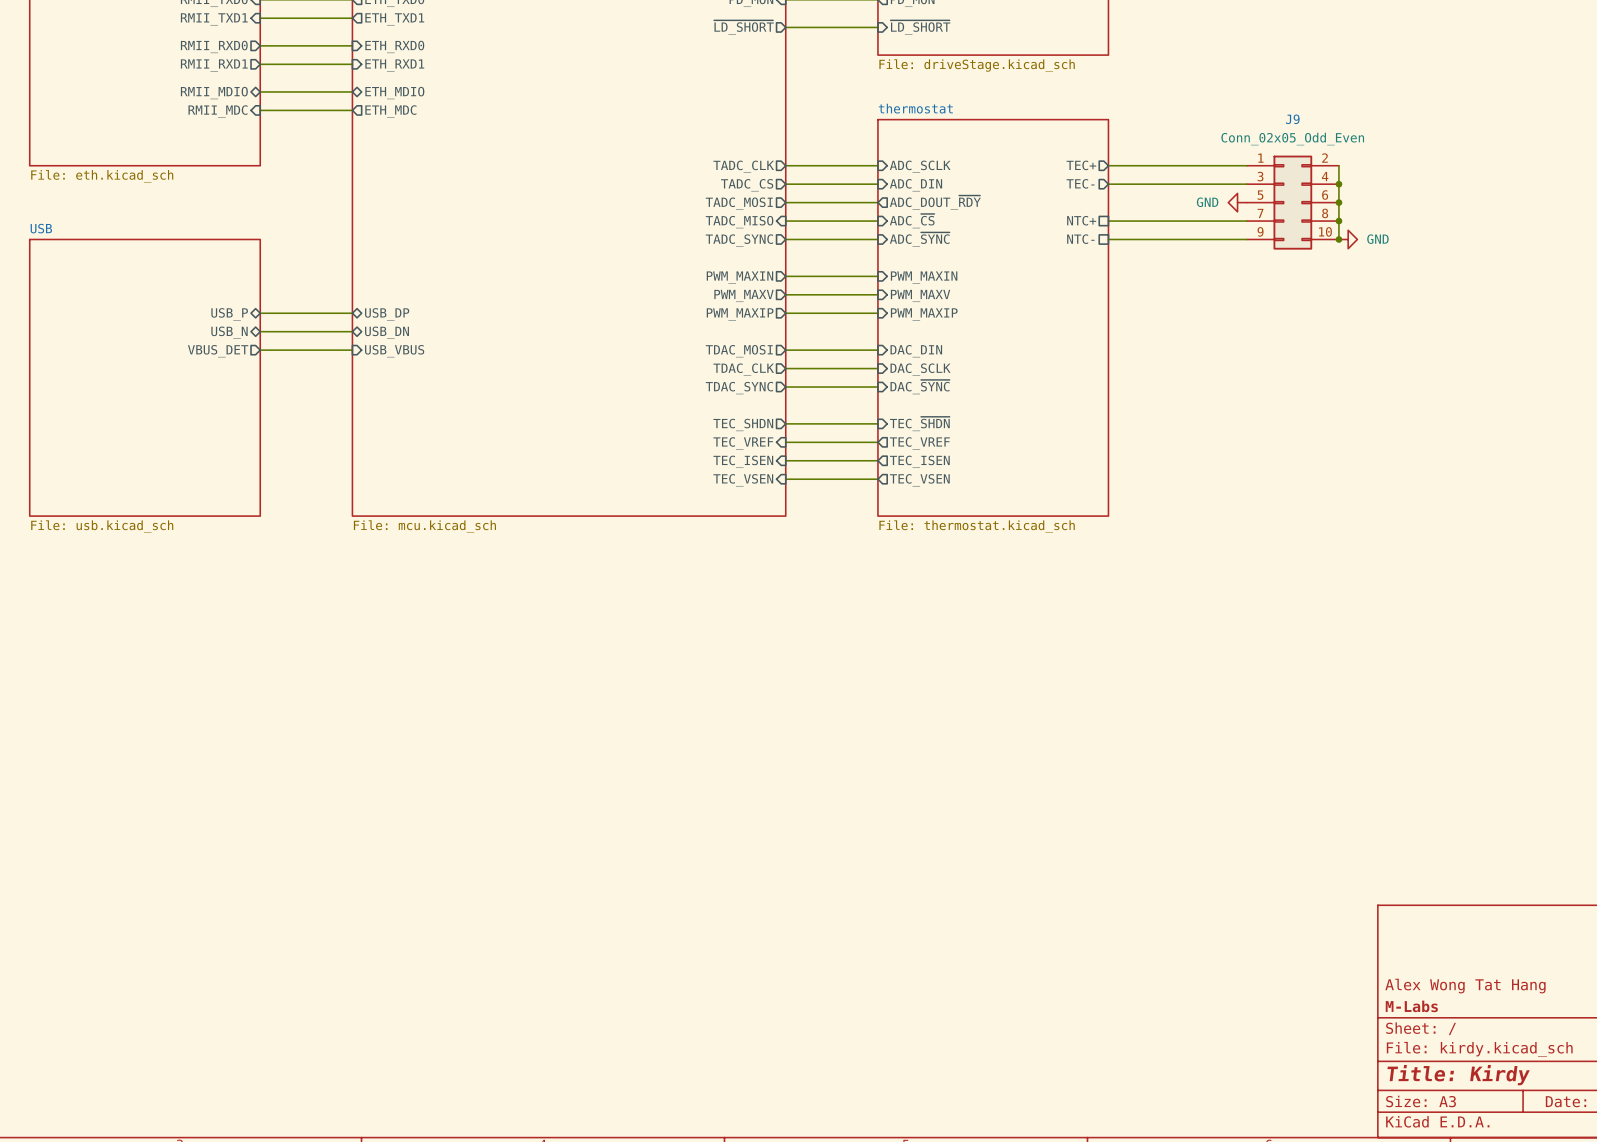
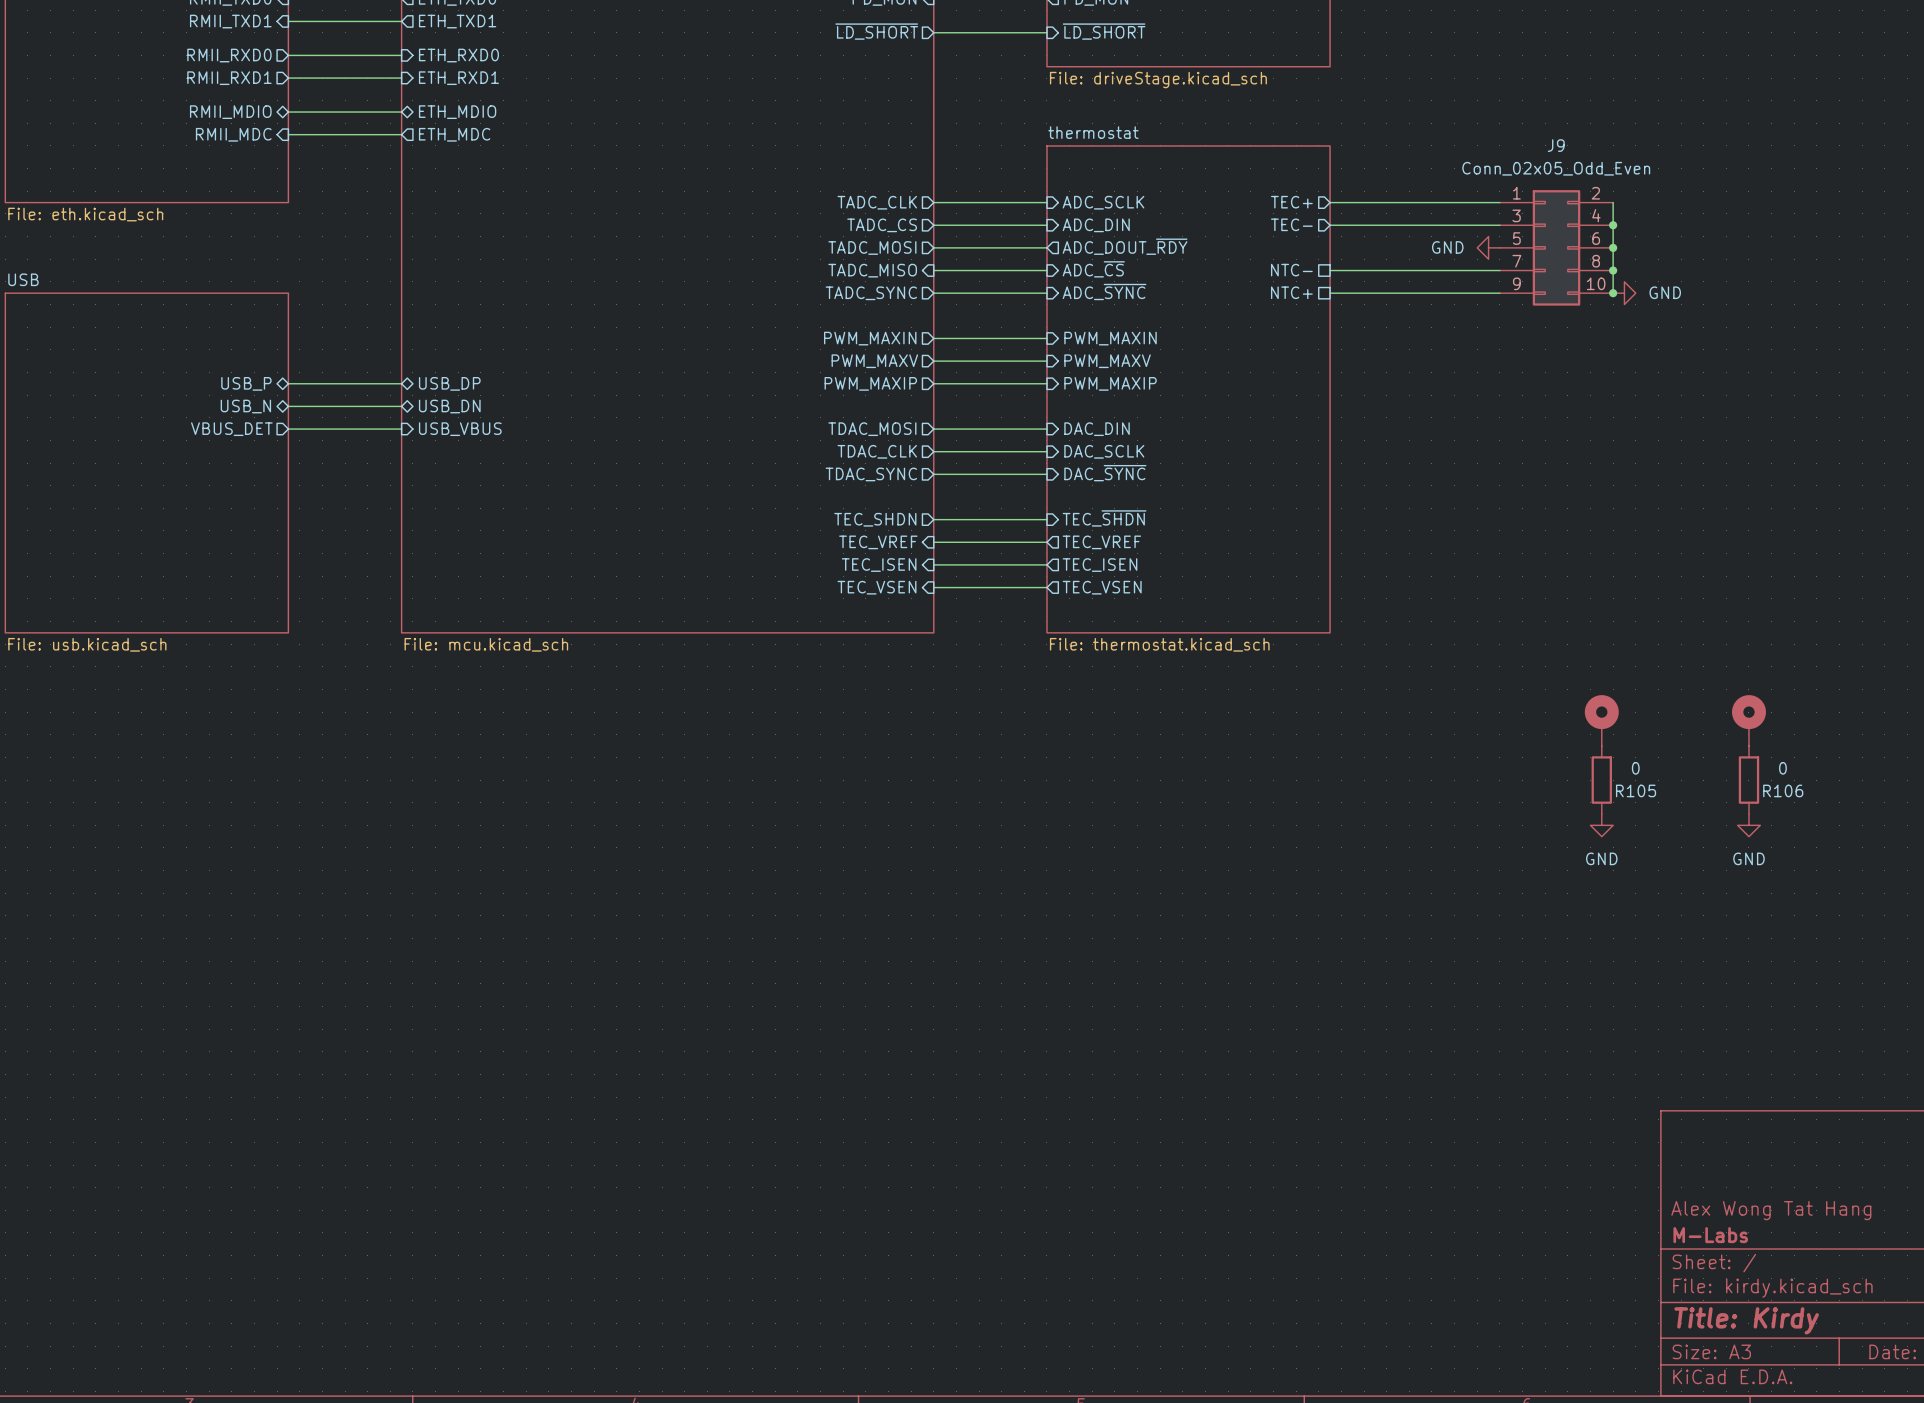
sheet pin: NTC+ (1081, 220) -> NTC- (1291, 270)
sheet pin: NTC- (1080, 239) -> NTC+ (1291, 292)
part: none -> (1601, 720)
part: none -> (1748, 720)
R105: none -> 0 (1601, 780)
R106: none -> 0 (1748, 780)
power symbol: none -> GND (1601, 825)
power symbol: none -> GND (1748, 825)

